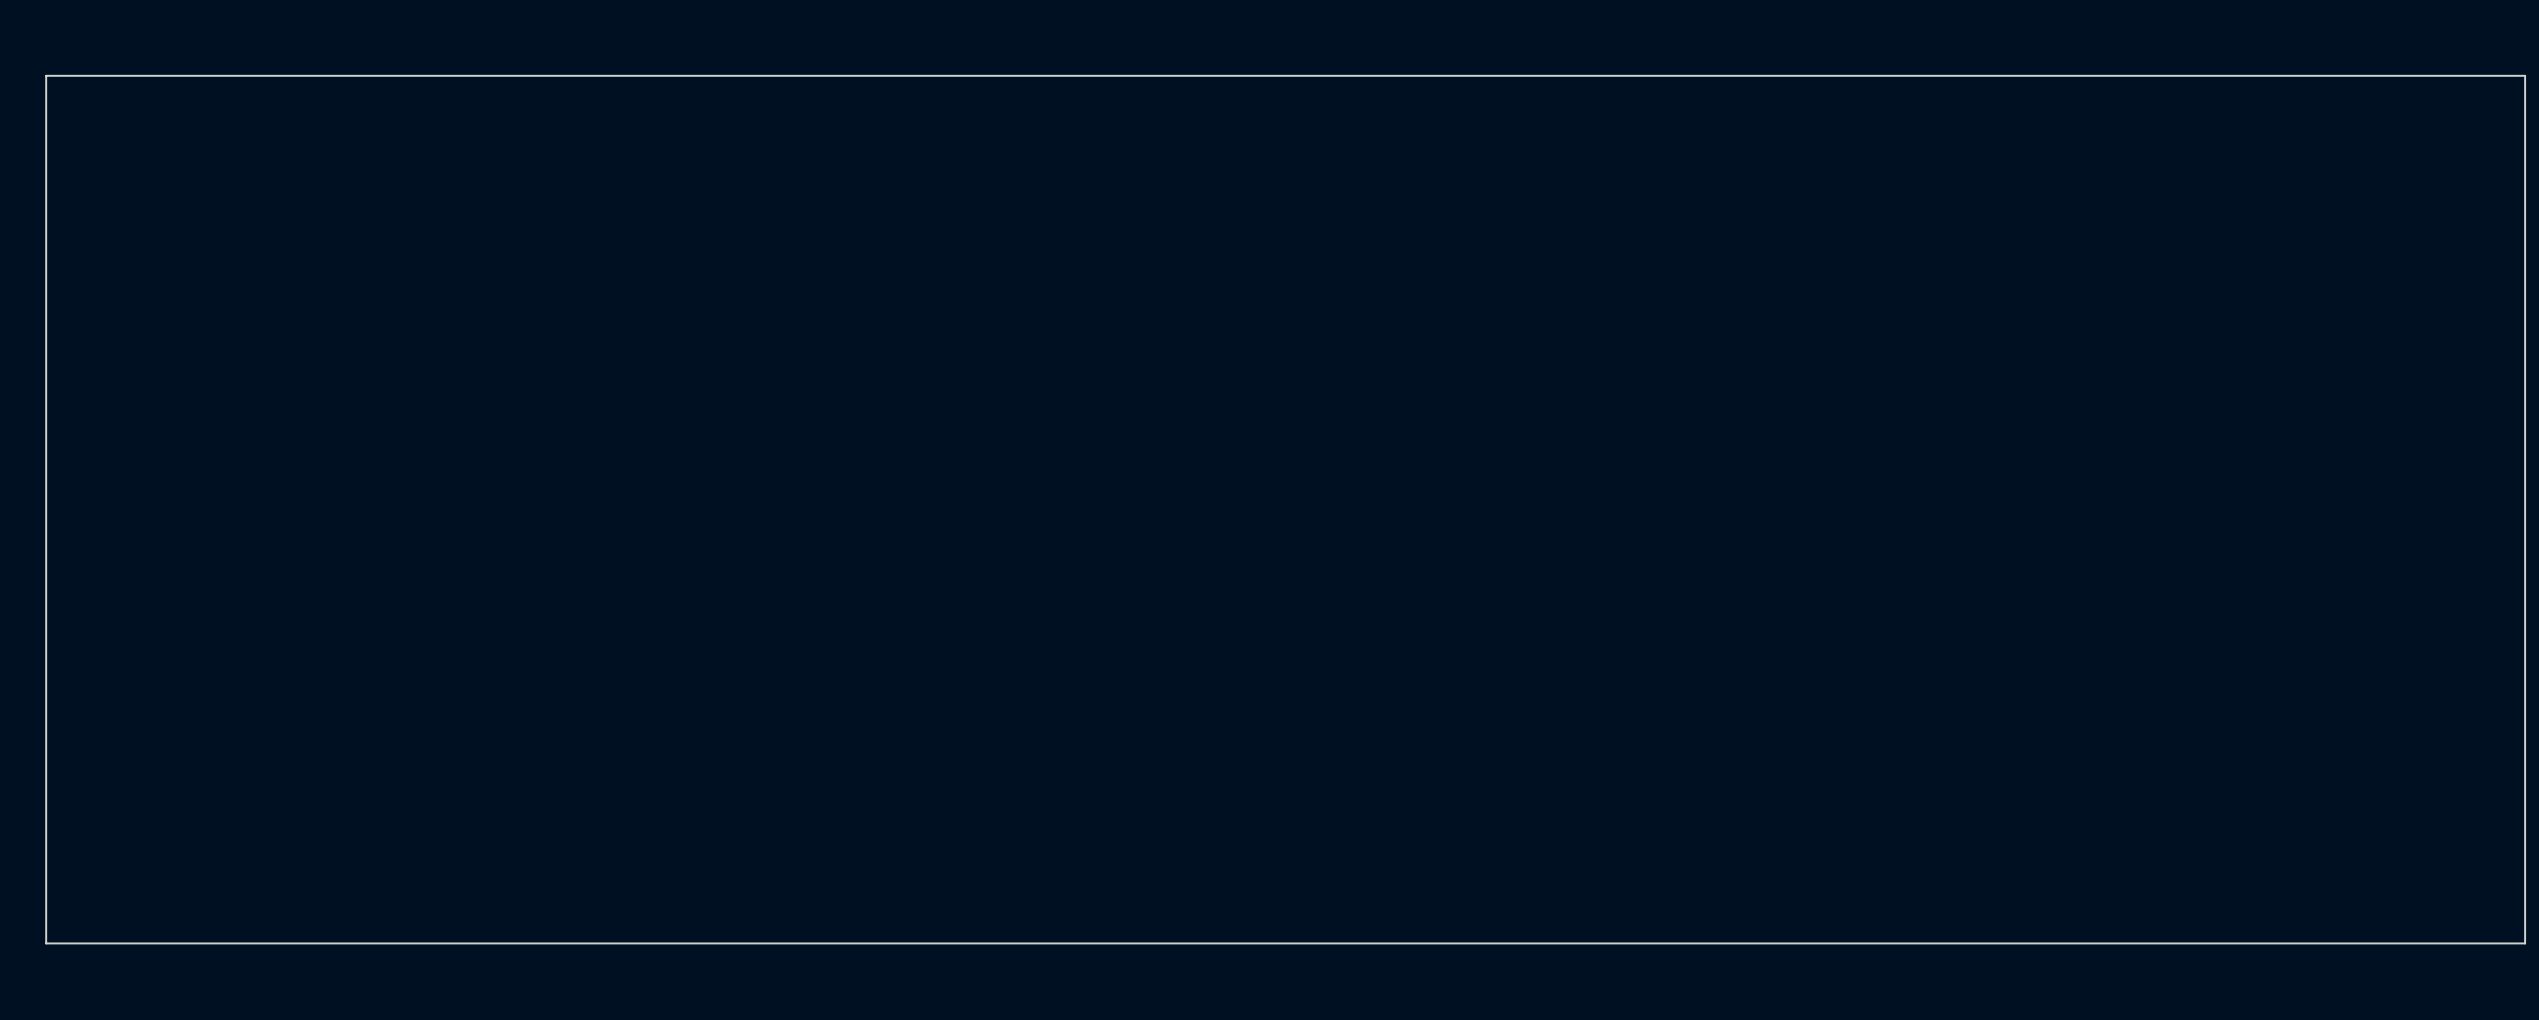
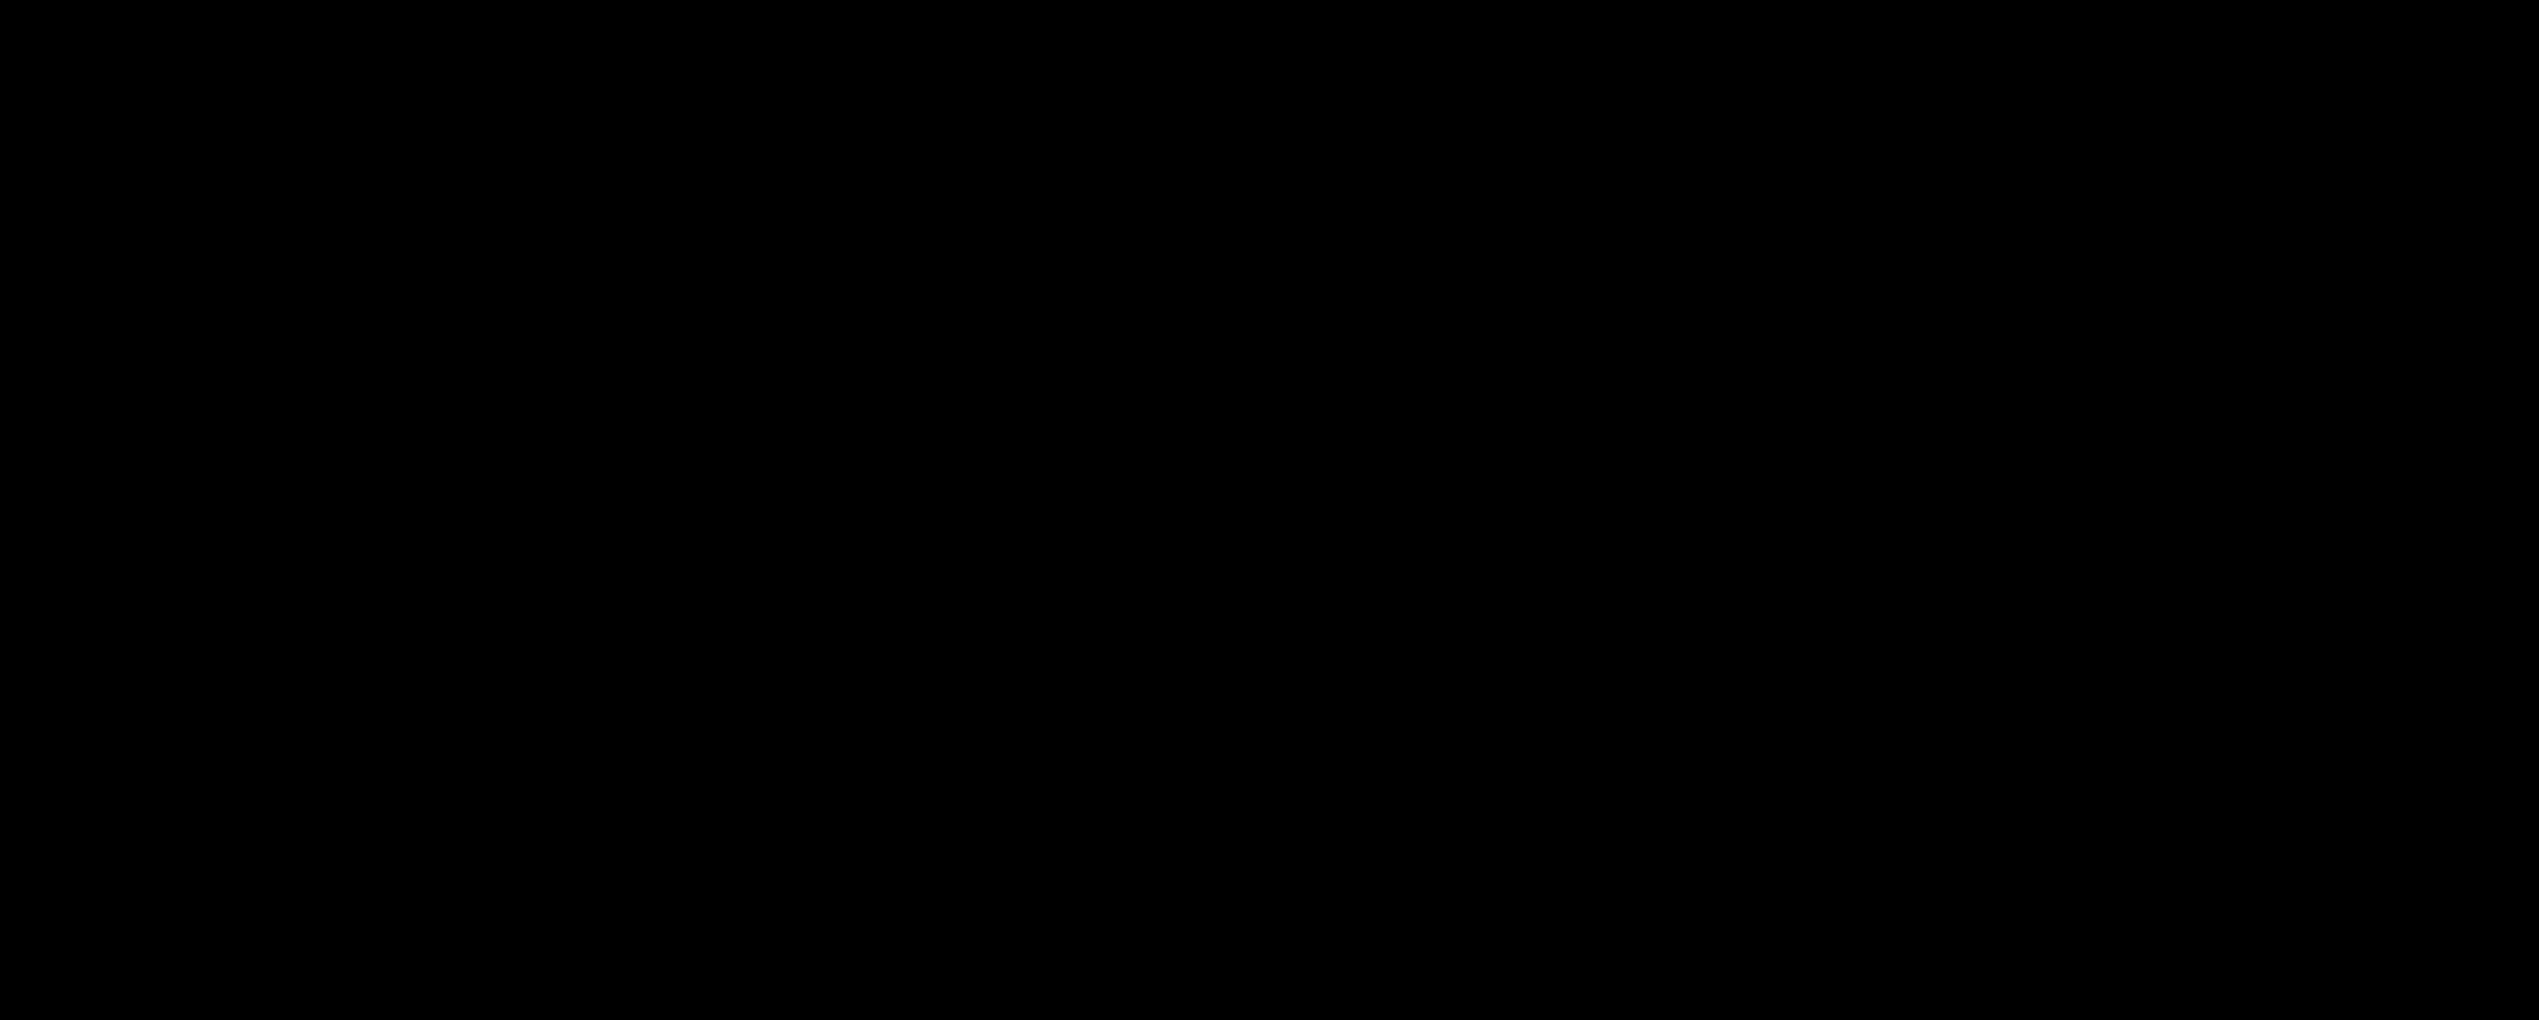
board edge: (46, 75) (2525, 75) (2525, 943) (46, 943) (46, 75) -> none

